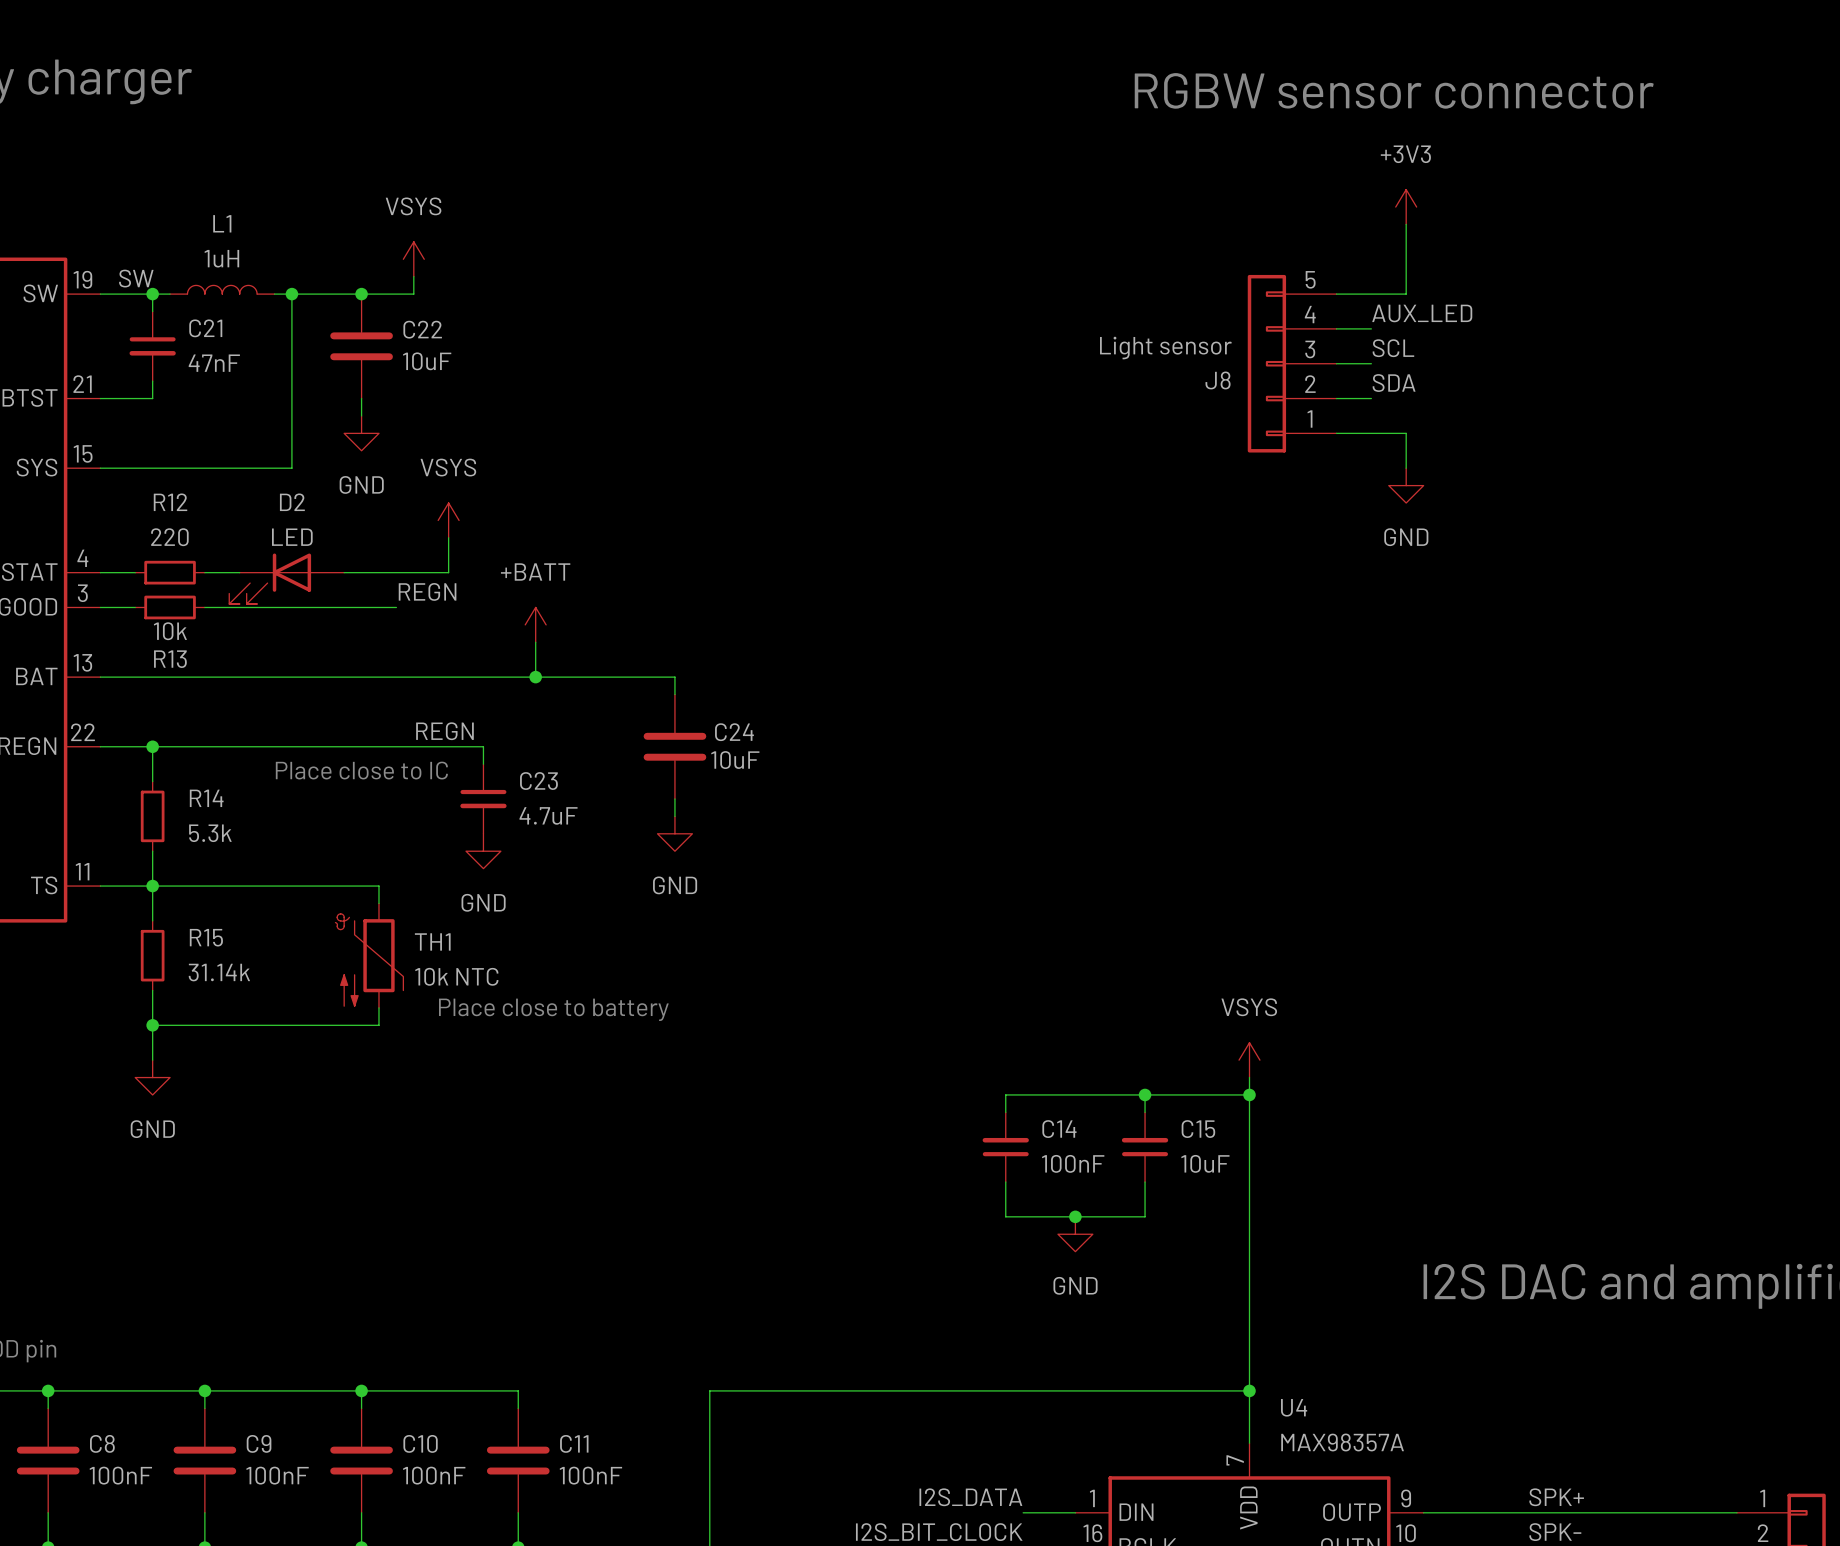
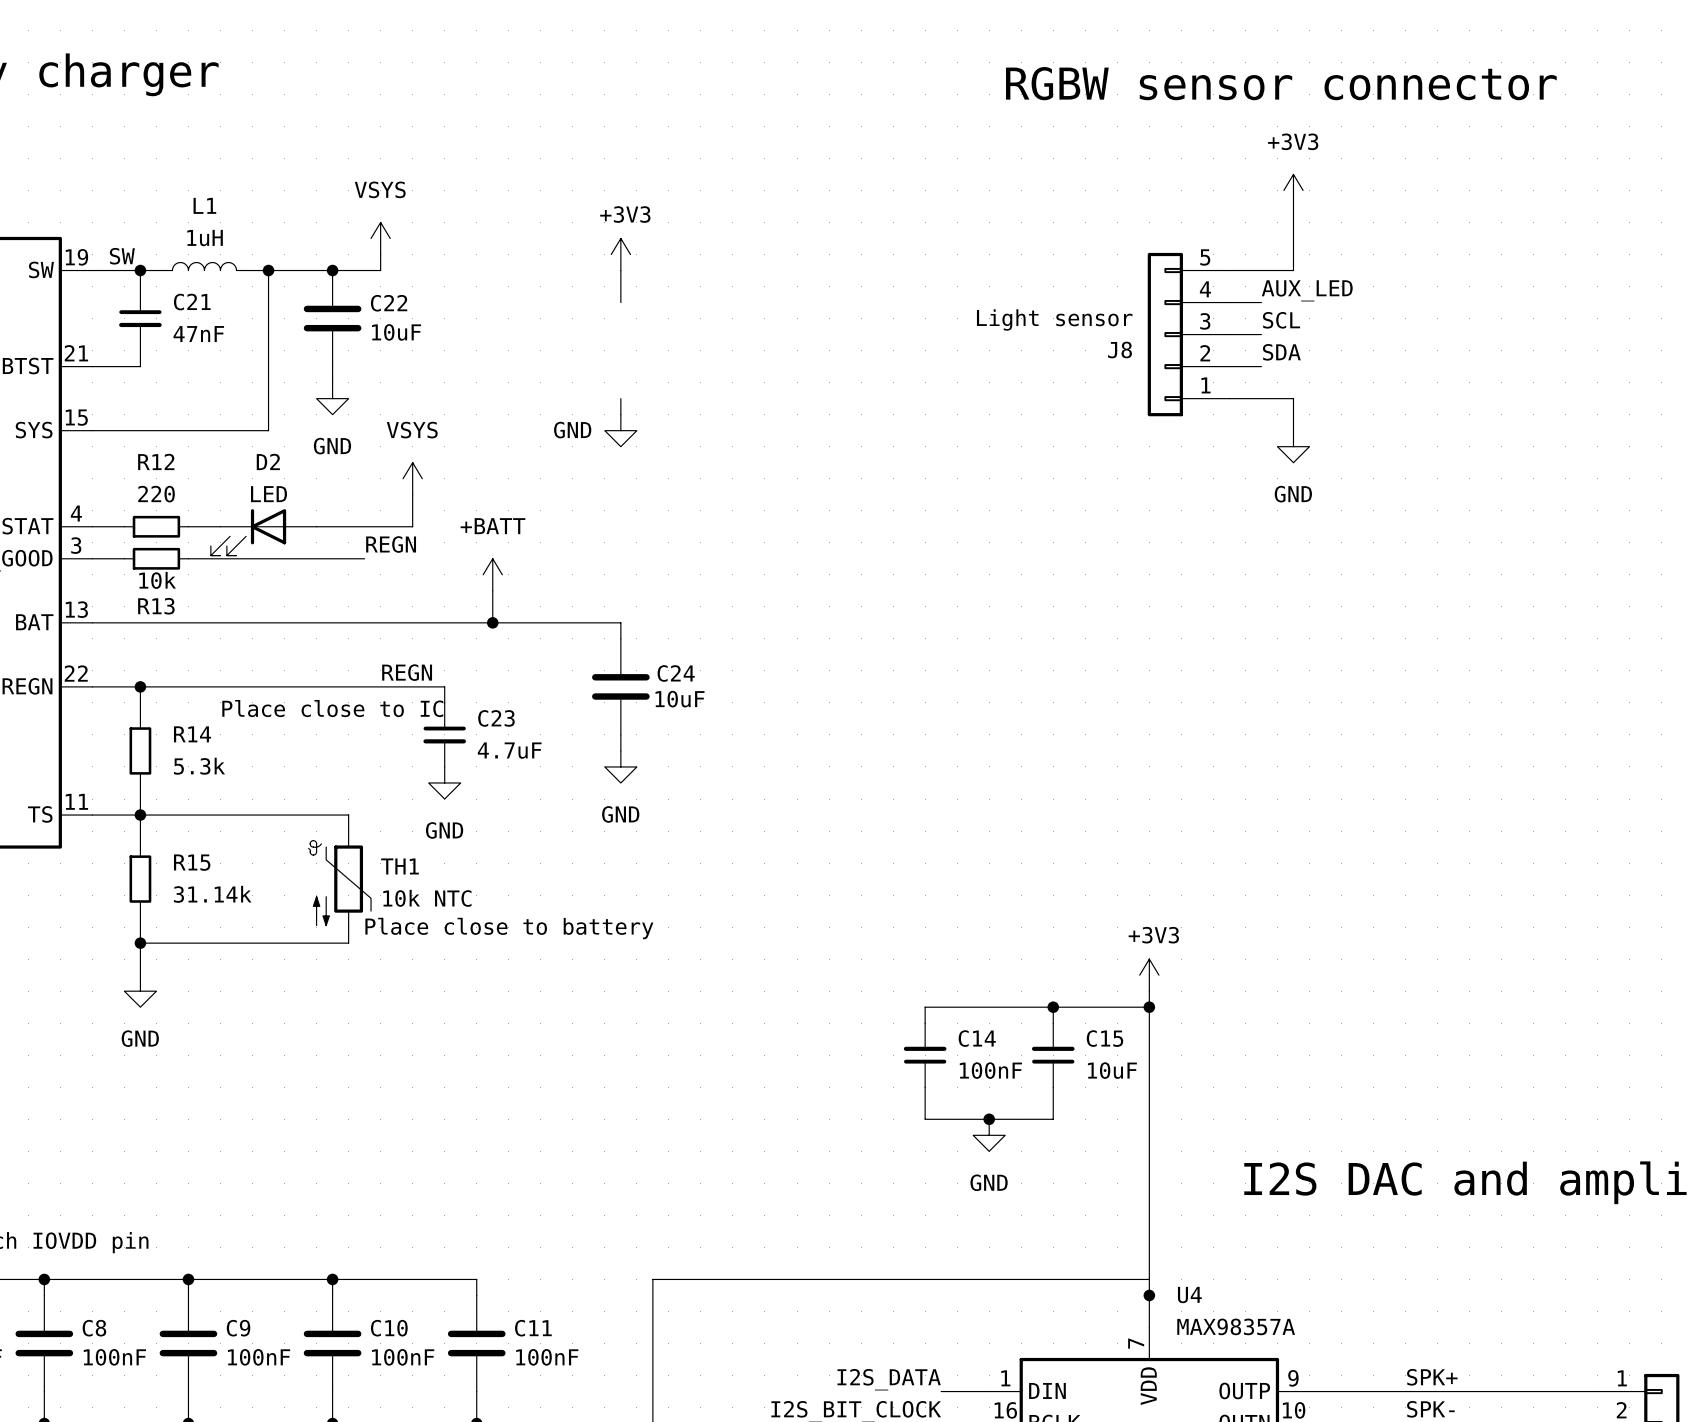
power symbol: none -> +3V3 (620, 254)
wire: none -> (620, 270) (620, 302)
wire: none -> (620, 398) (620, 414)
power symbol: none -> GND (620, 430)
power symbol: VSYS (1249, 1060) -> +3V3 (1149, 975)
junction position: (1249, 1390) -> (1149, 1295)

